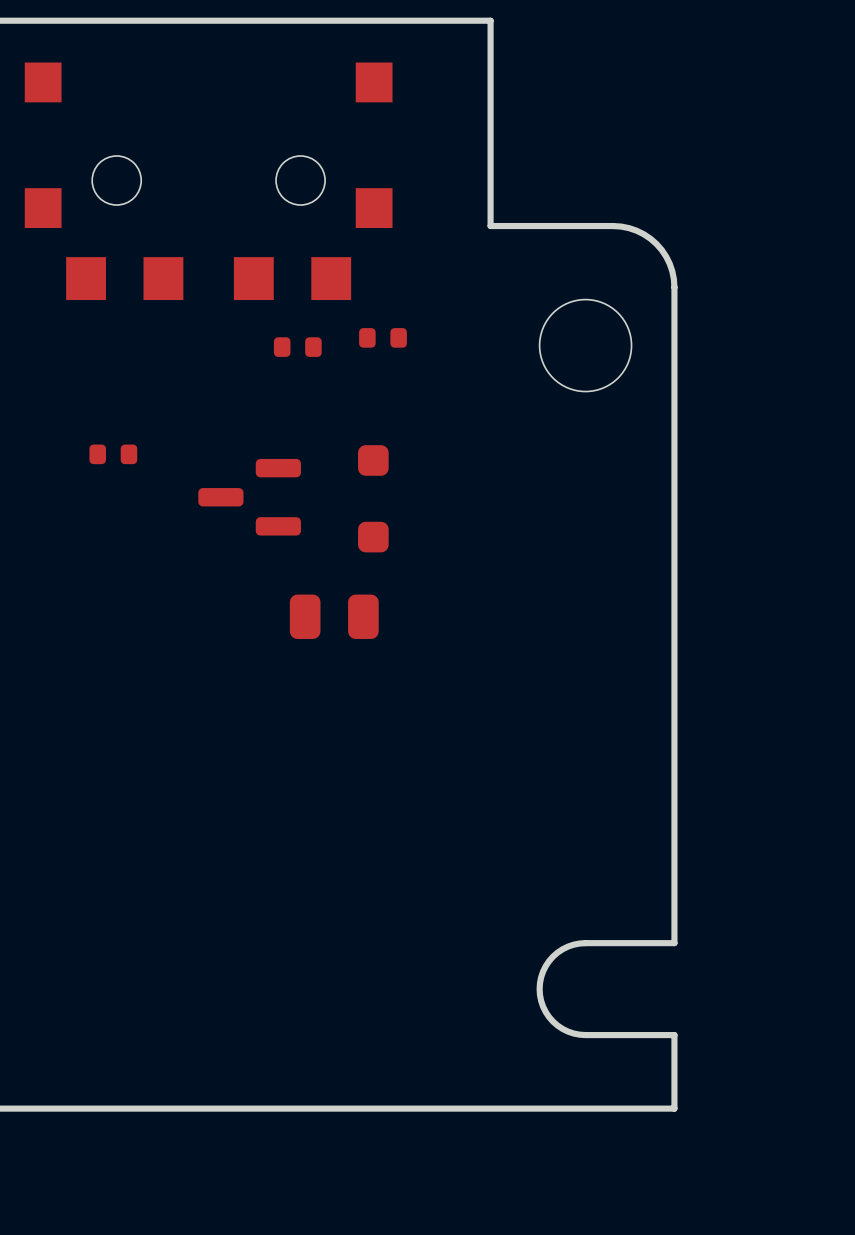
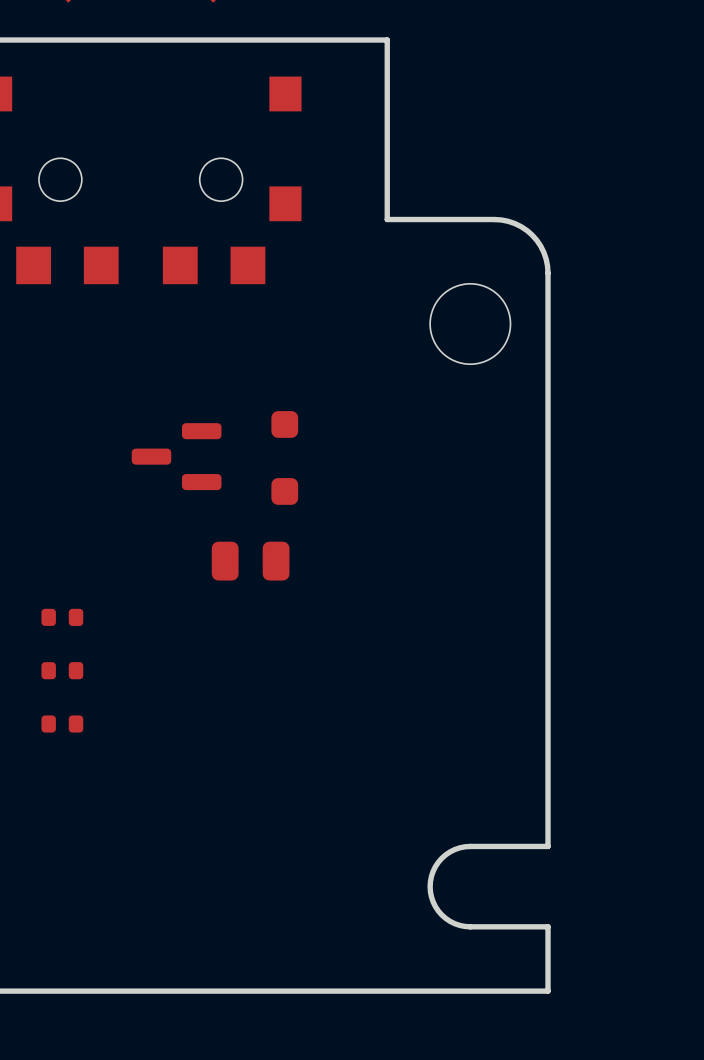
part: (383, 337) -> none
part: (297, 347) -> none
part: (113, 454) -> none
part: none -> (62, 617)
part: none -> (62, 670)
part: none -> (62, 724)

